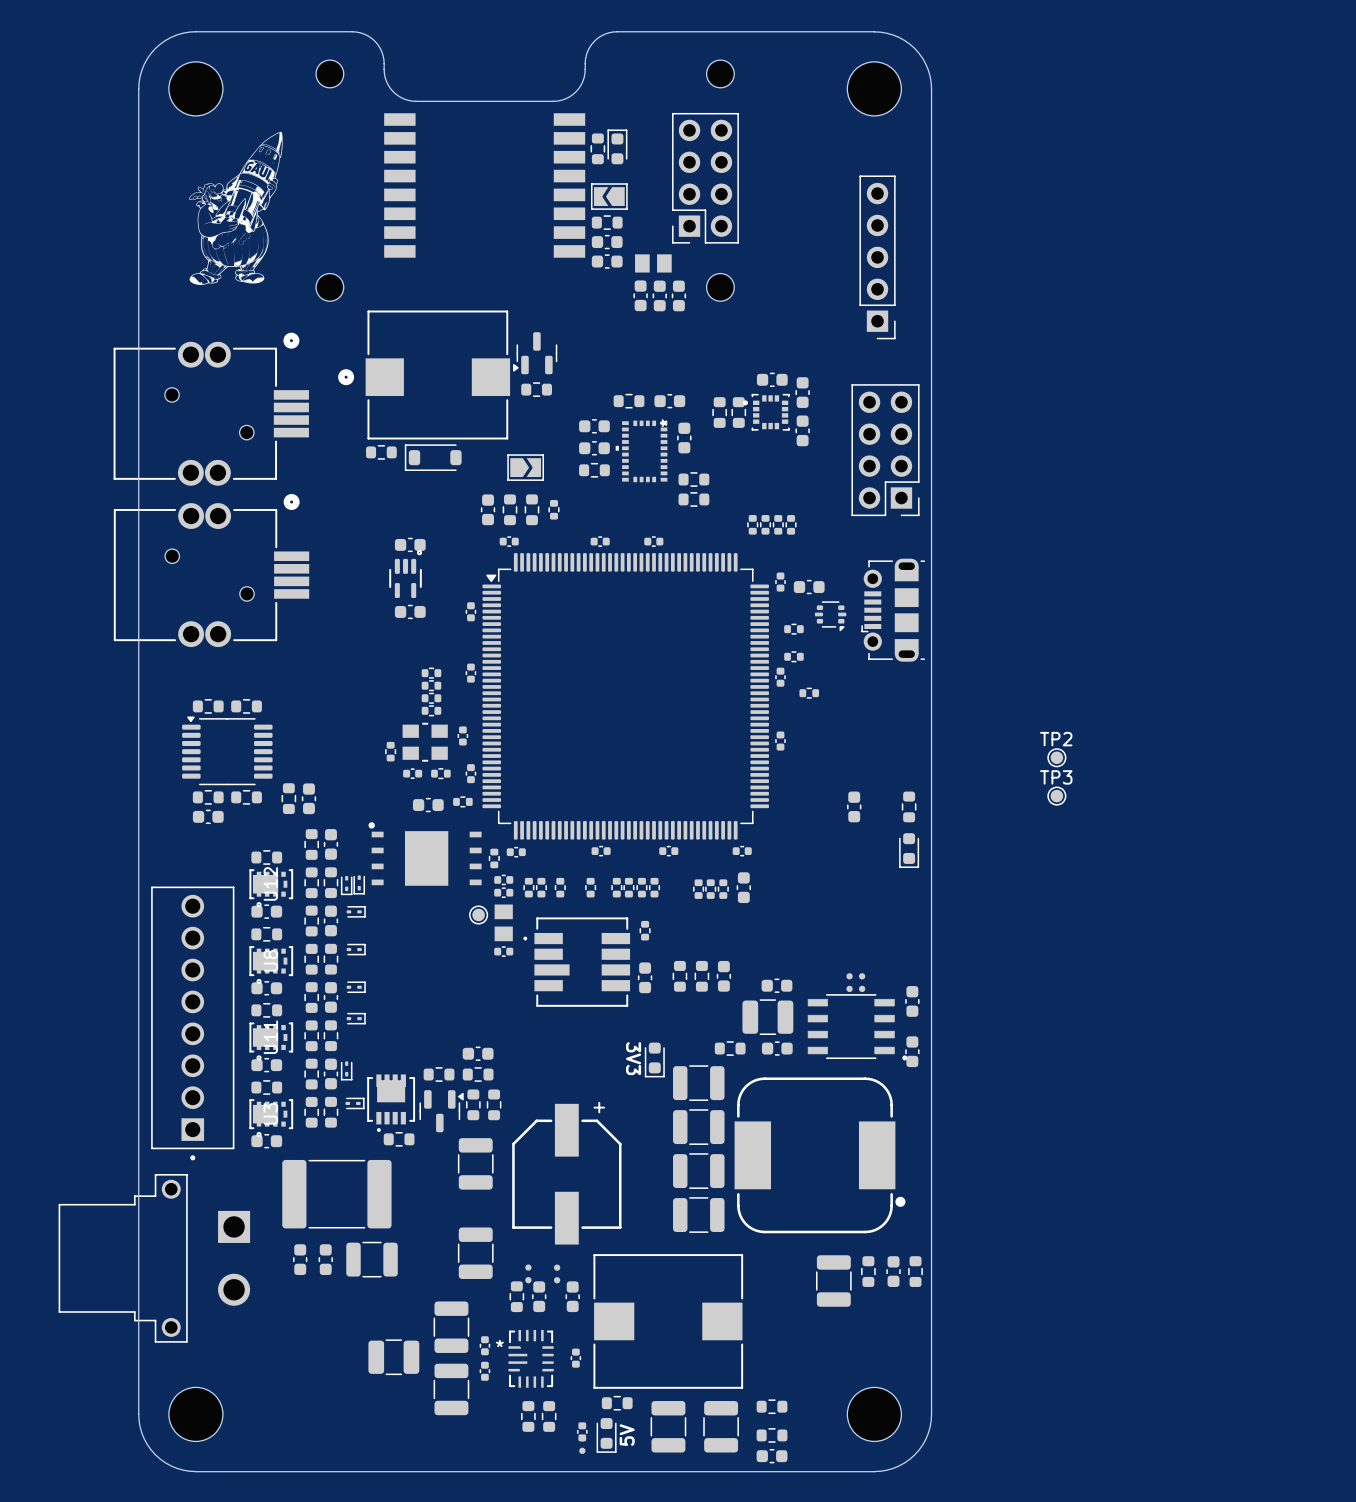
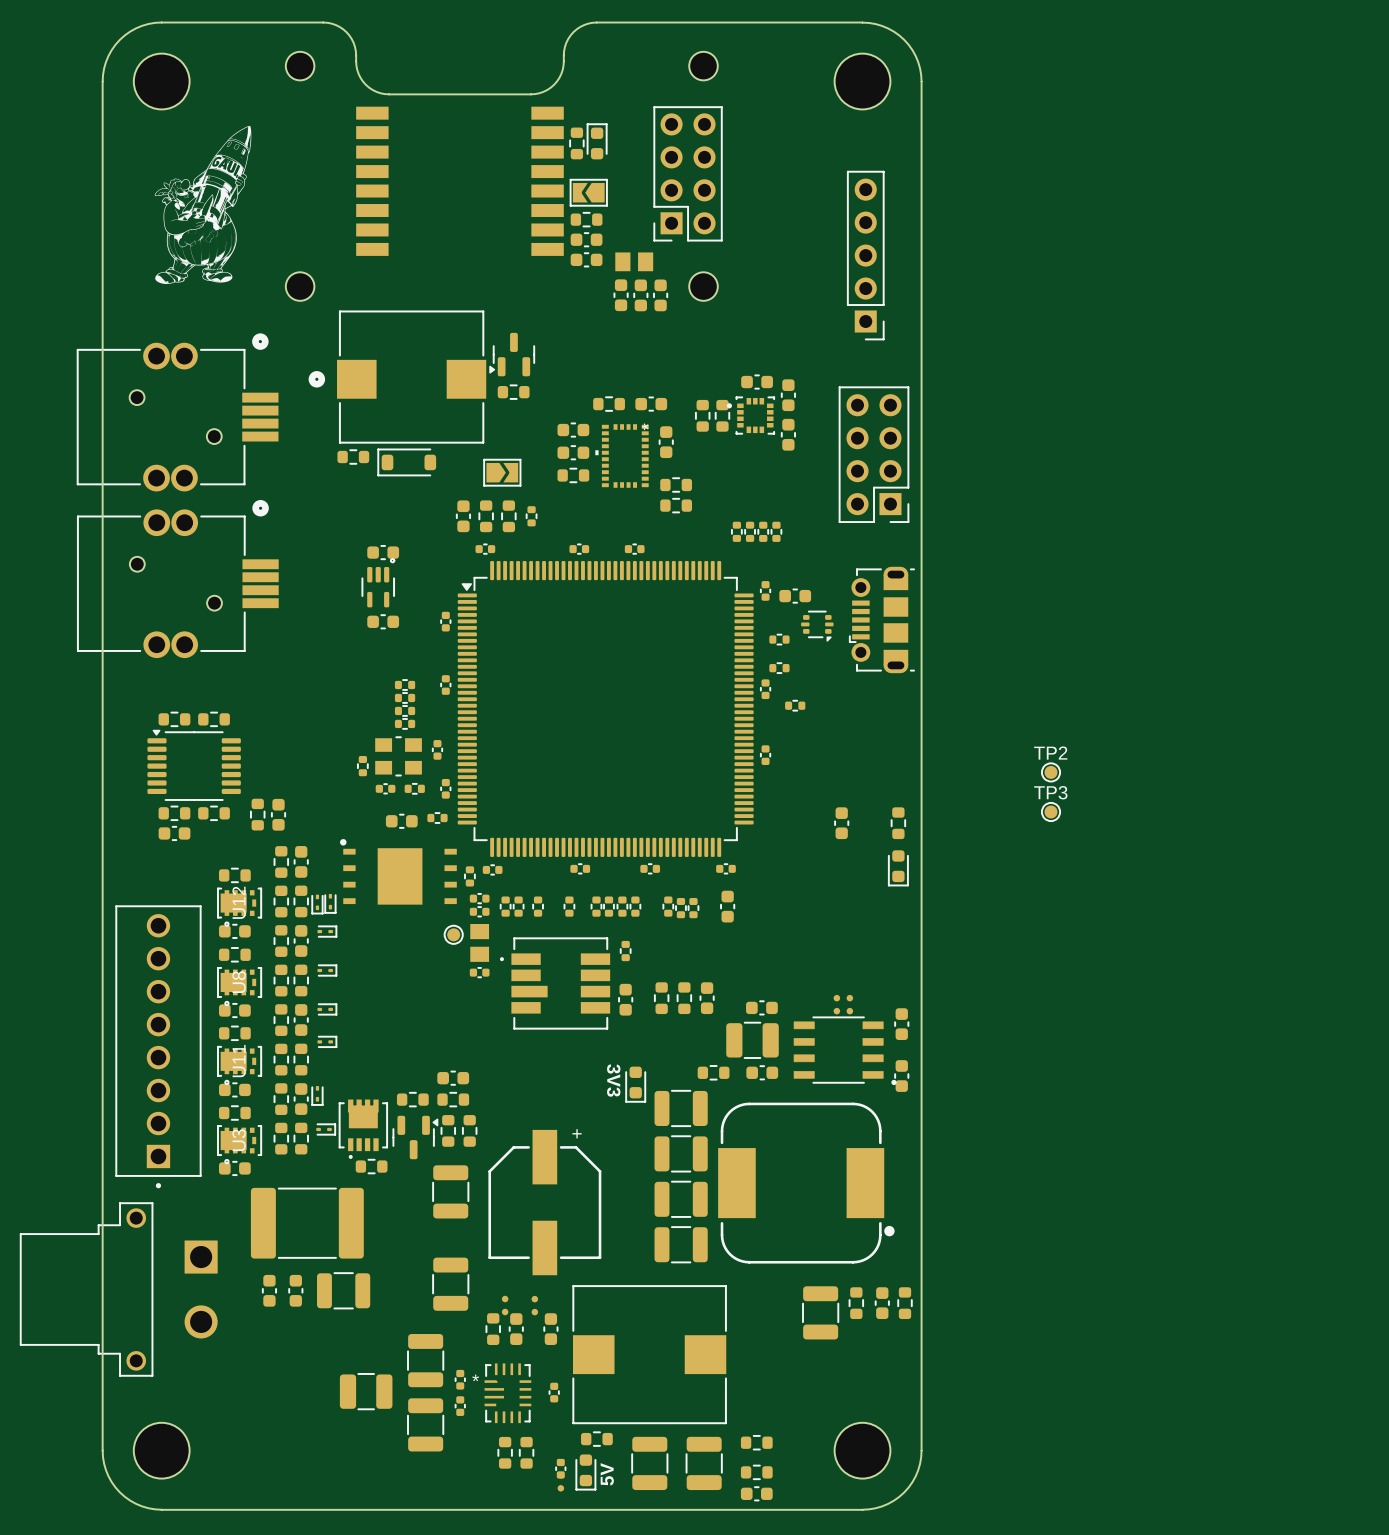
part position: (723, 889) -> (668, 906)

